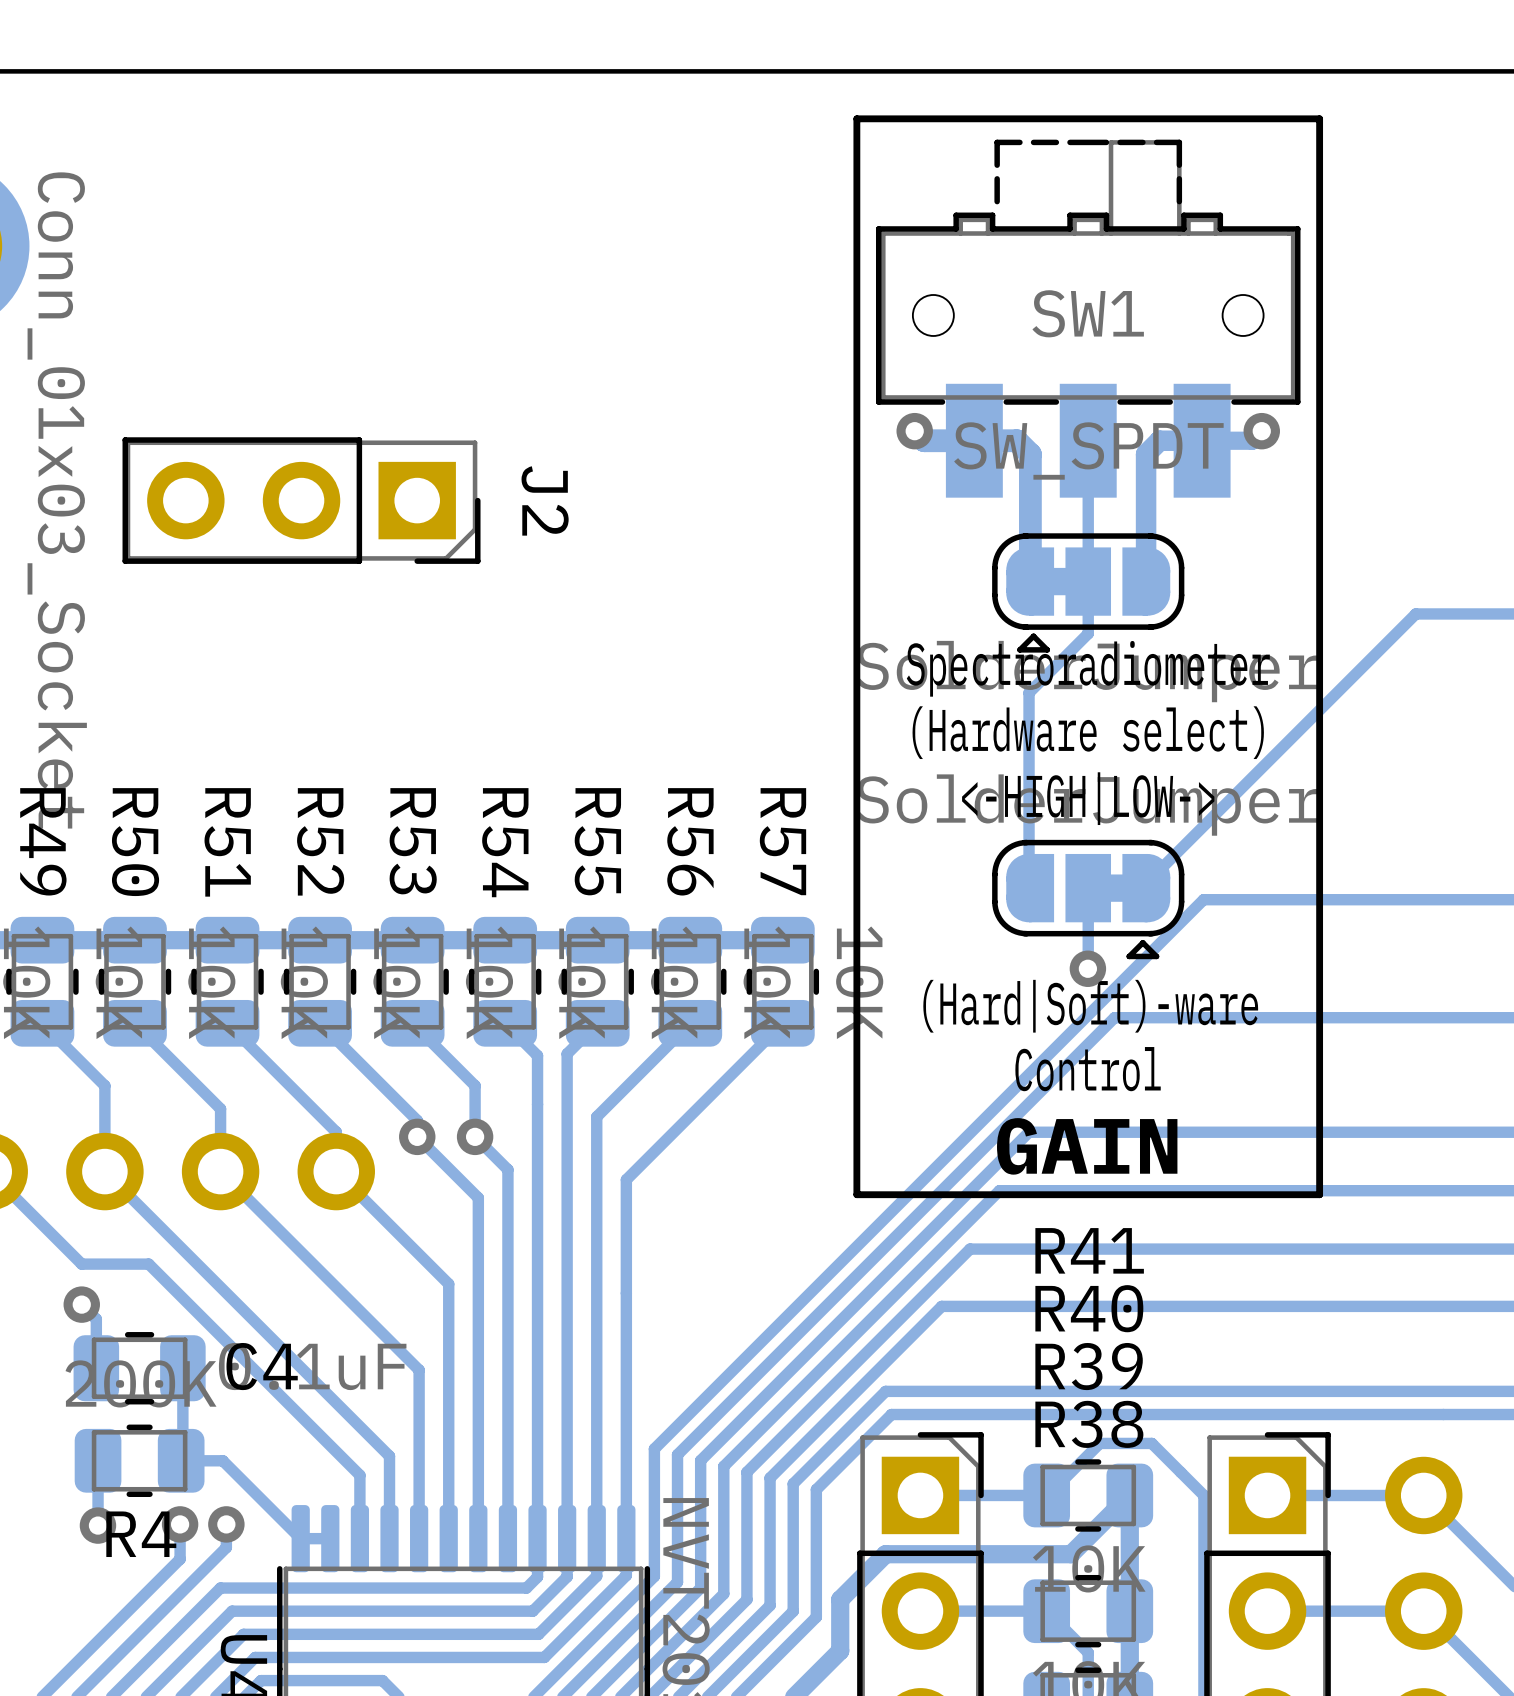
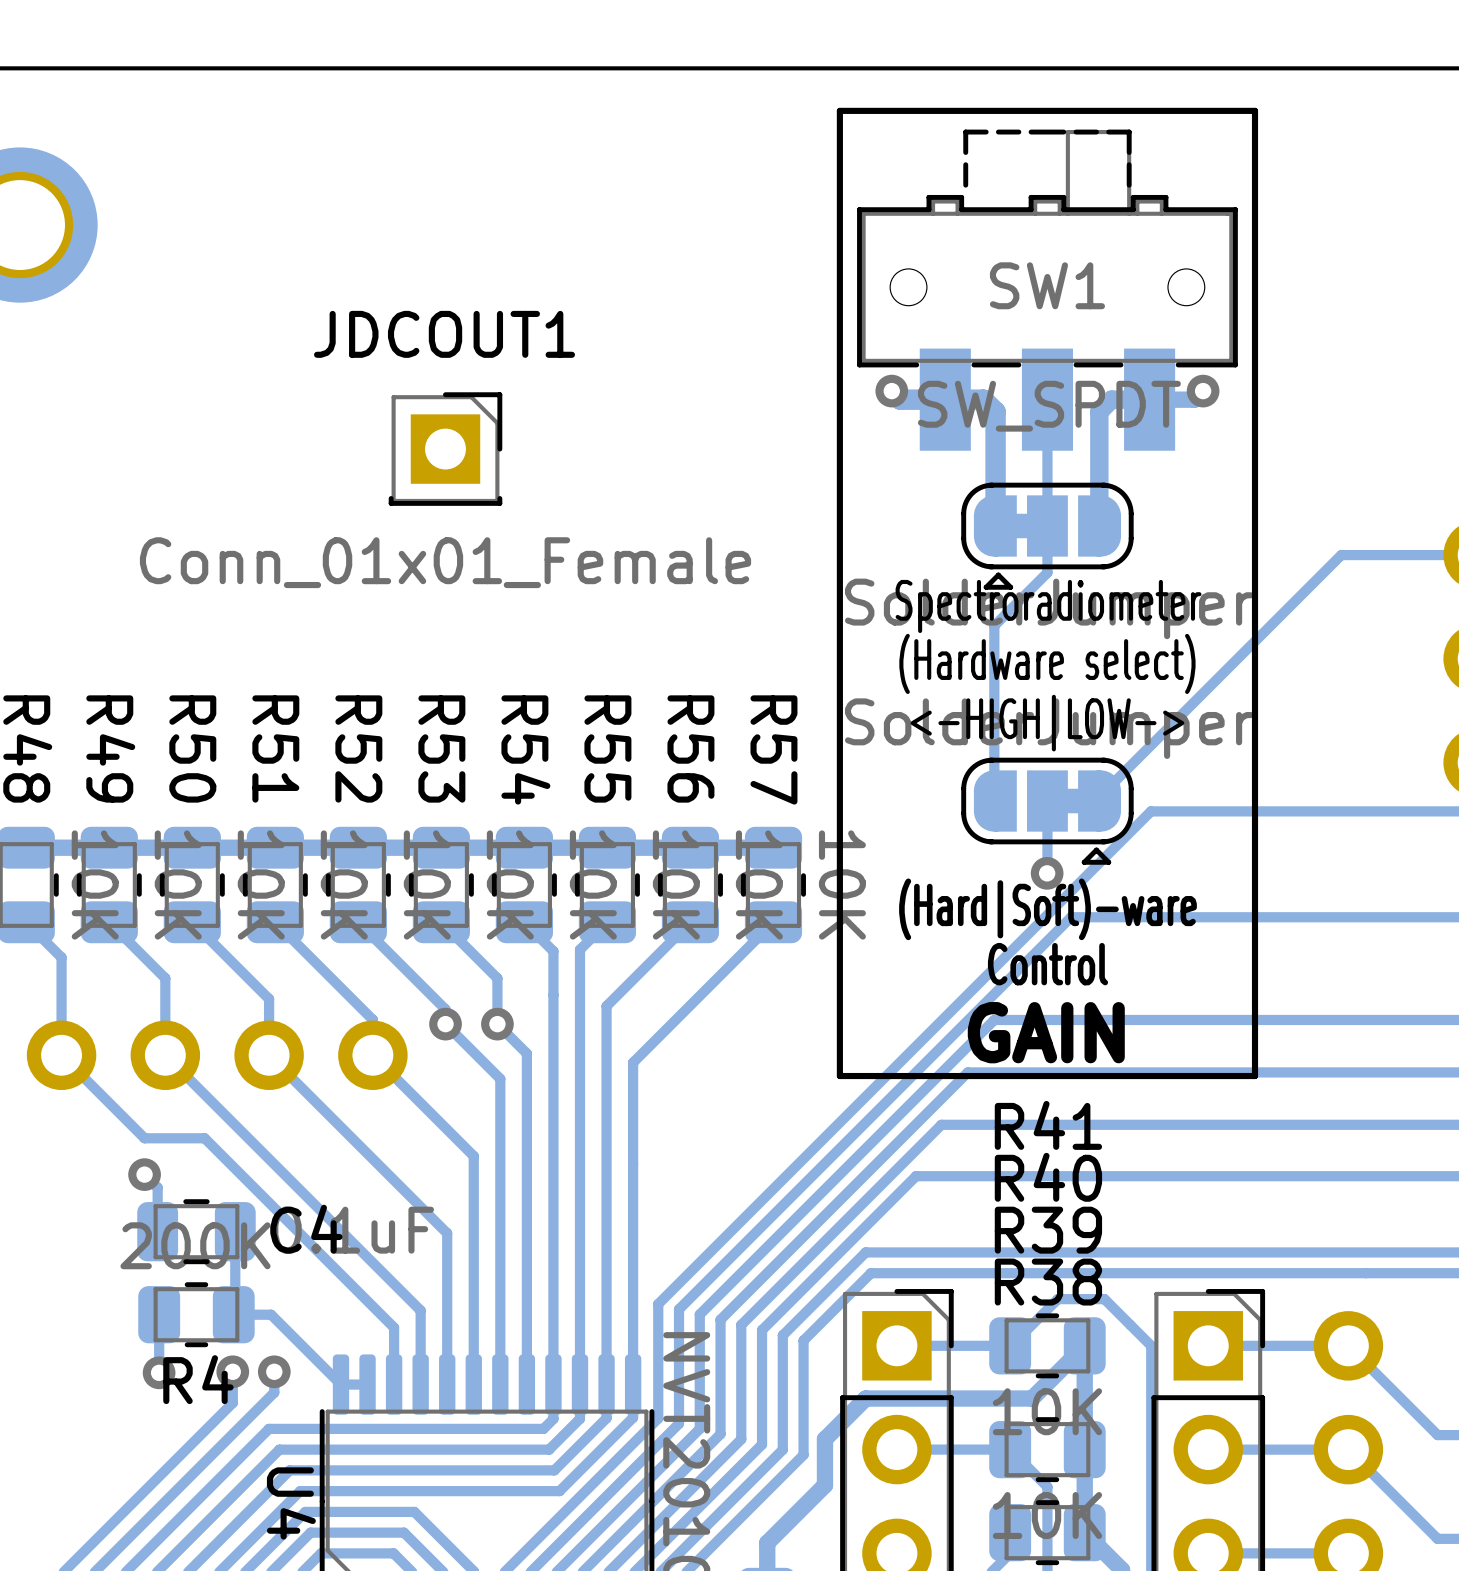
JDCOUT1: none -> Conn_01x01_Female (445, 449)
J2: Conn_01x03_Socket (301, 500) -> none

